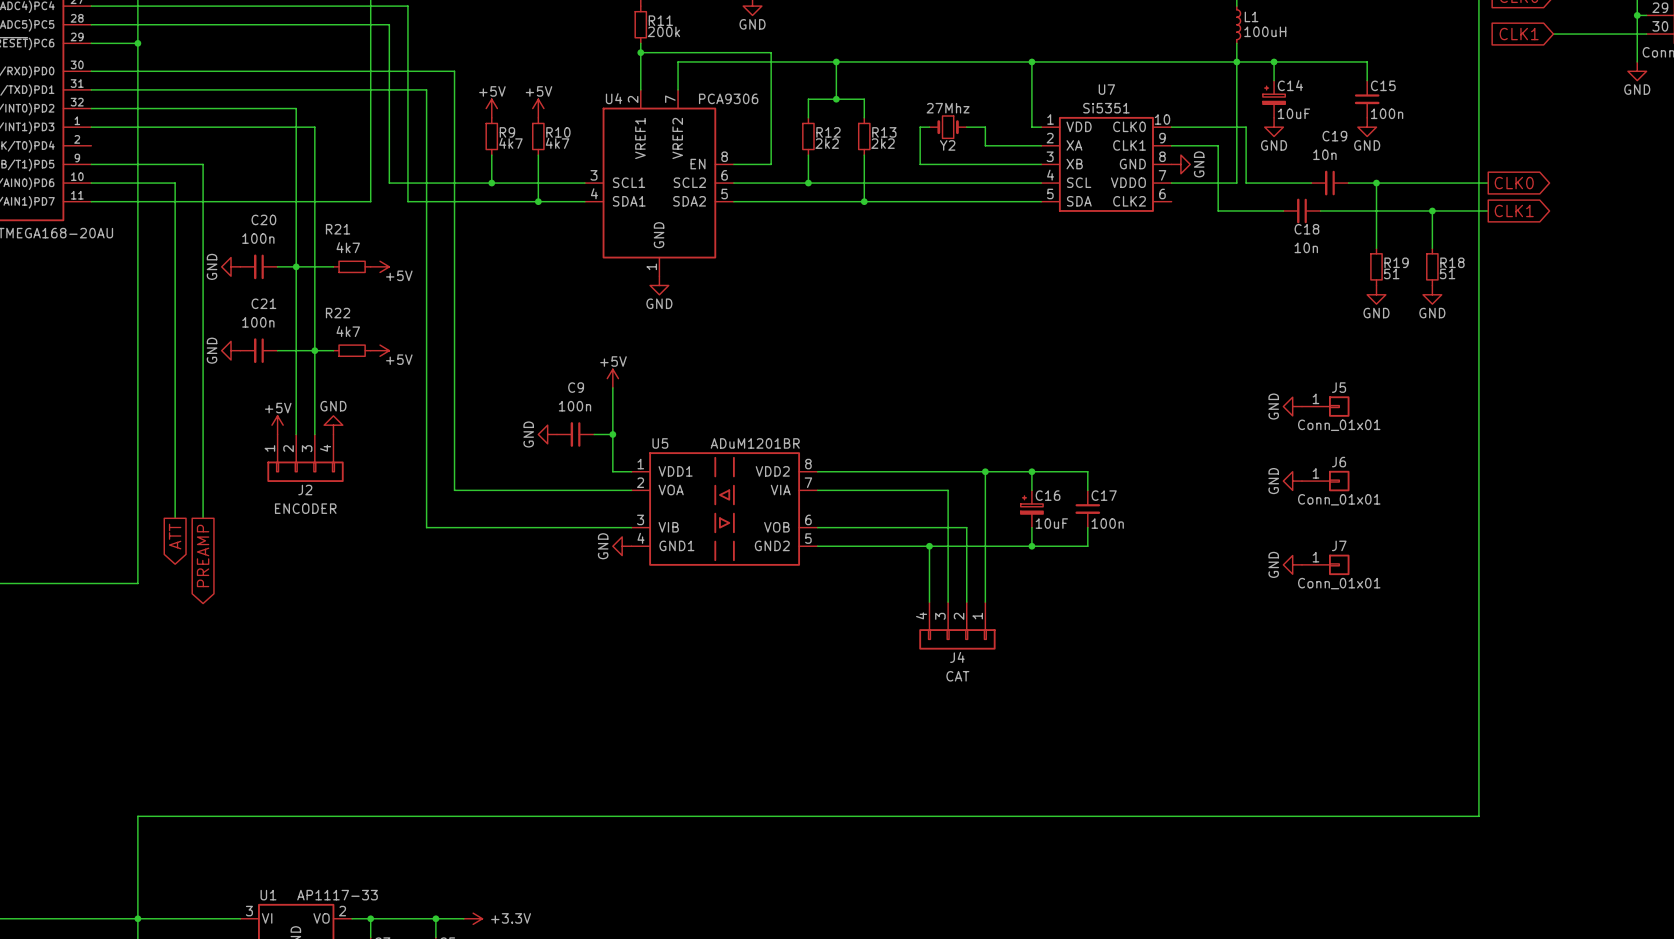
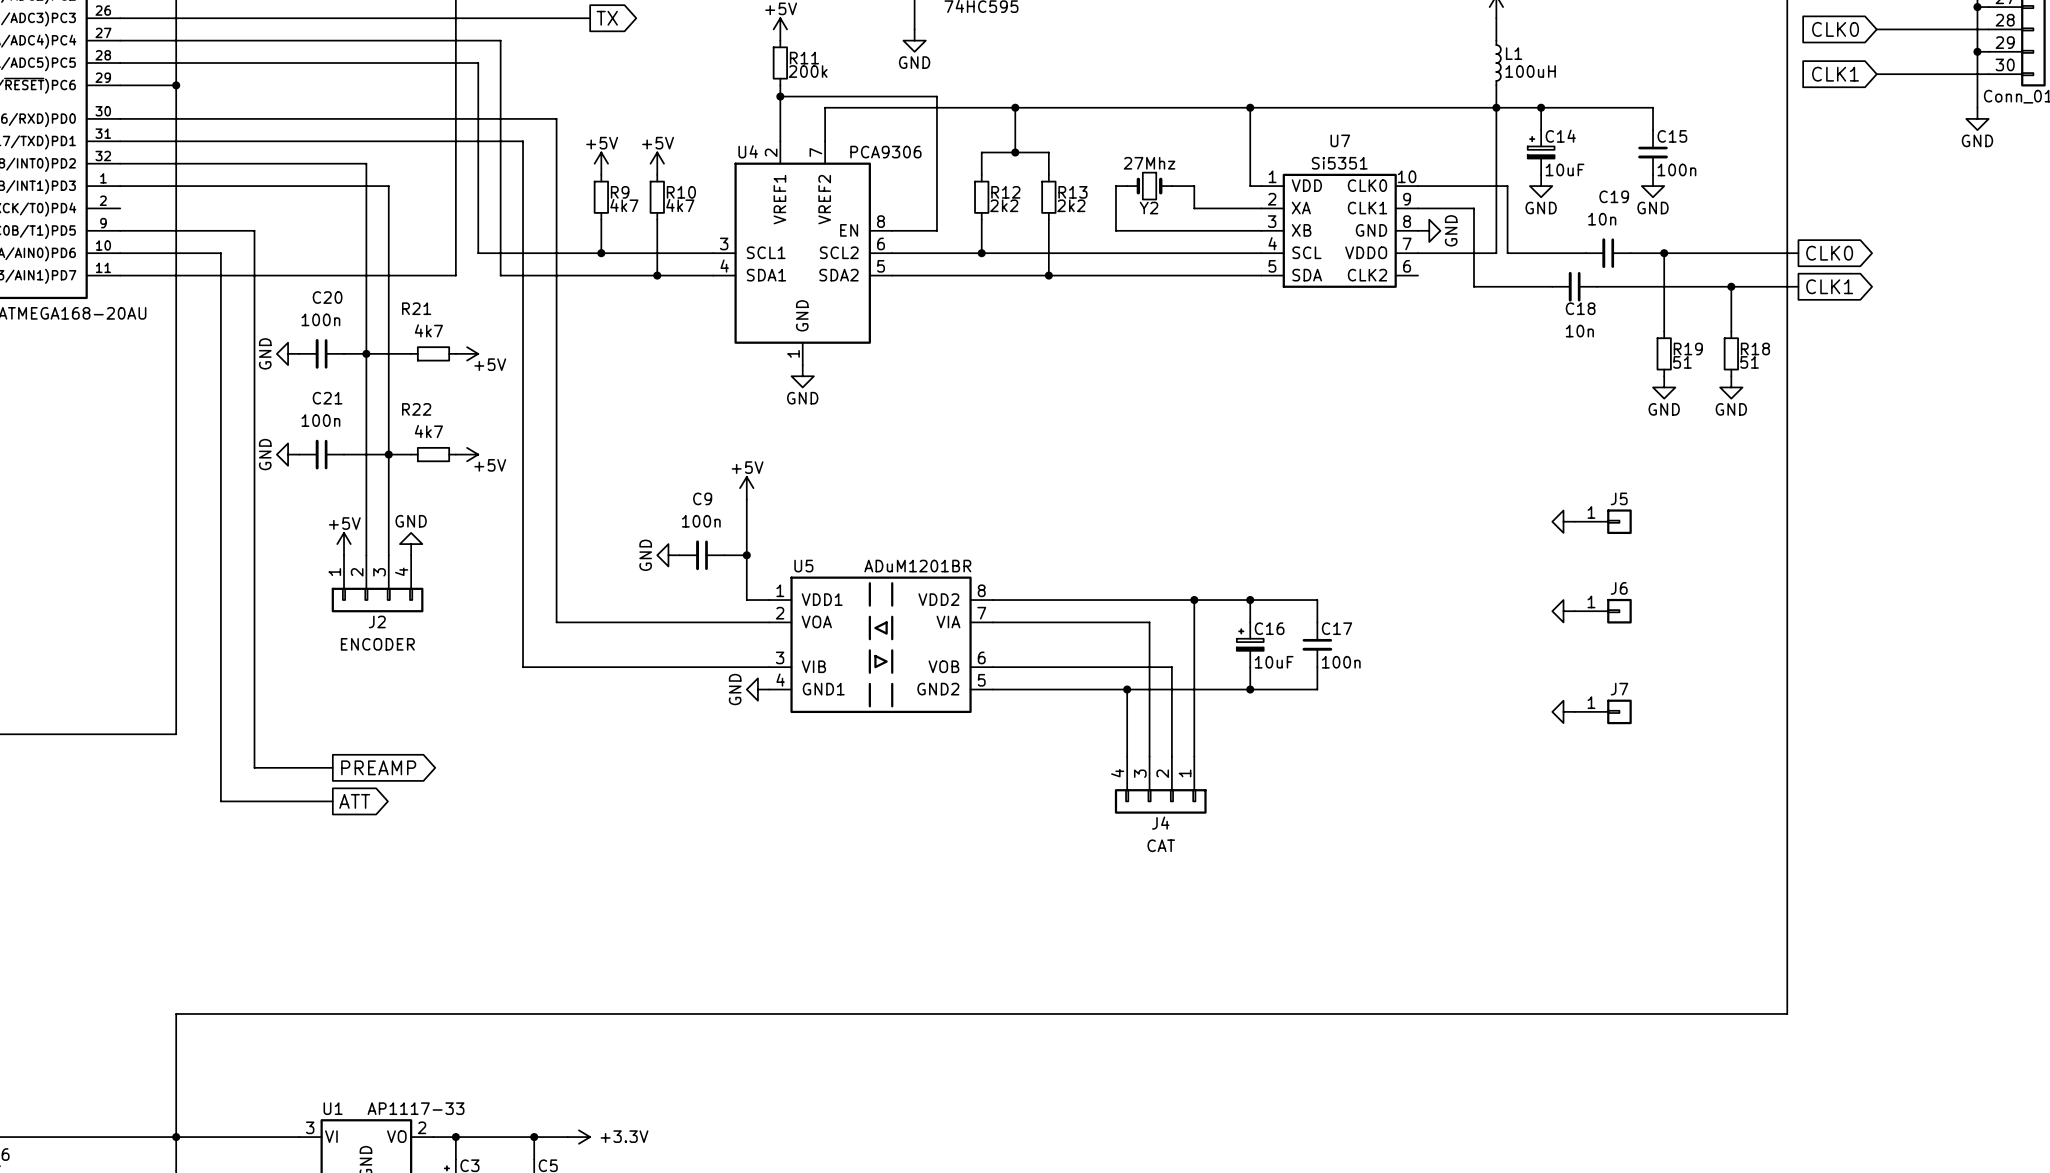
power symbol text: GND (1273, 406) -> none
J5 value: Conn_01x01 (1339, 425) -> none
power symbol text: GND (1273, 481) -> none
J6 value: Conn_01x01 (1339, 499) -> none
wire: none -> (220, 655) (220, 801) (332, 801)
wire: none -> (254, 655) (254, 767) (332, 767)
global label rotation: 0° (175, 536) -> 90° counterclockwise (354, 801)
global label position: ATT (175, 536) -> ATT (354, 801)
global label rotation: 0° (203, 555) -> 90° counterclockwise (378, 767)
global label position: PREAMP (203, 555) -> PREAMP (378, 767)
power symbol text: GND (1273, 564) -> none
J7 value: Conn_01x01 (1339, 583) -> none

